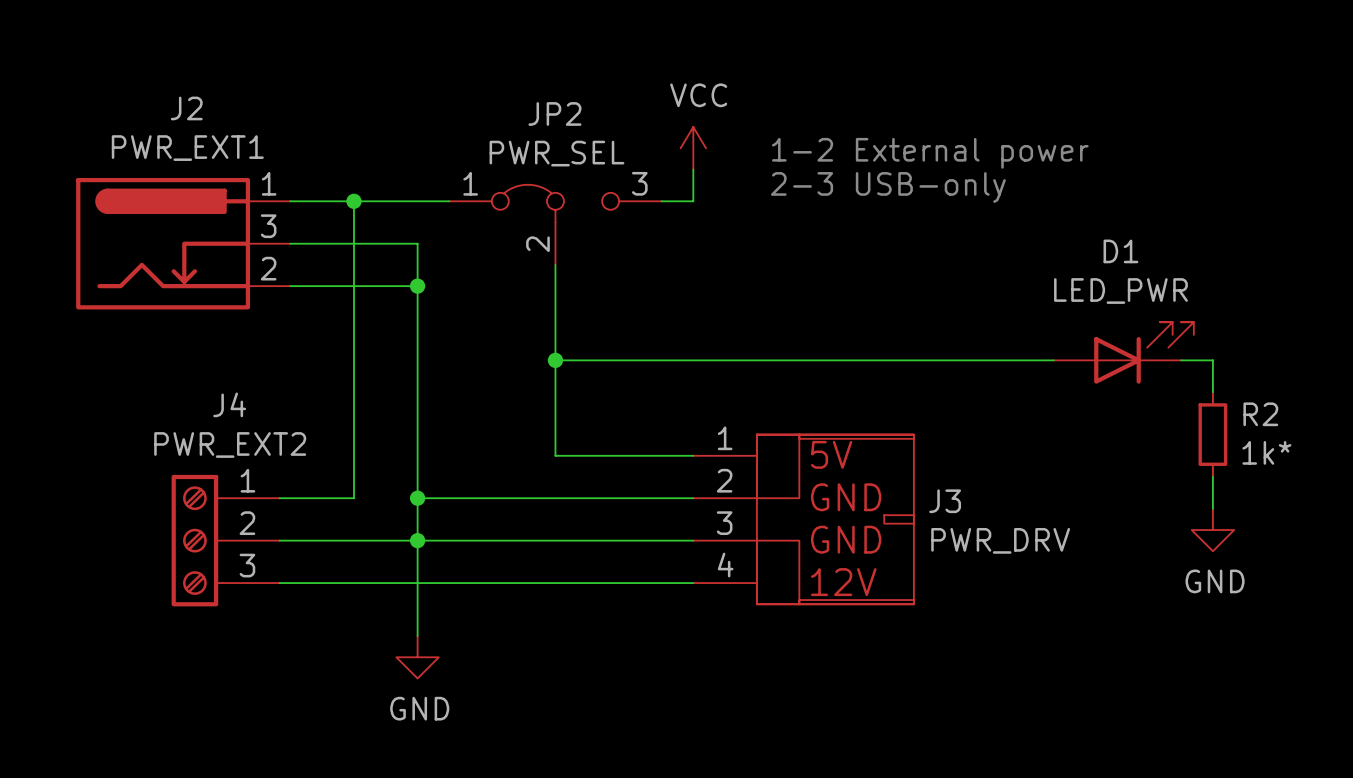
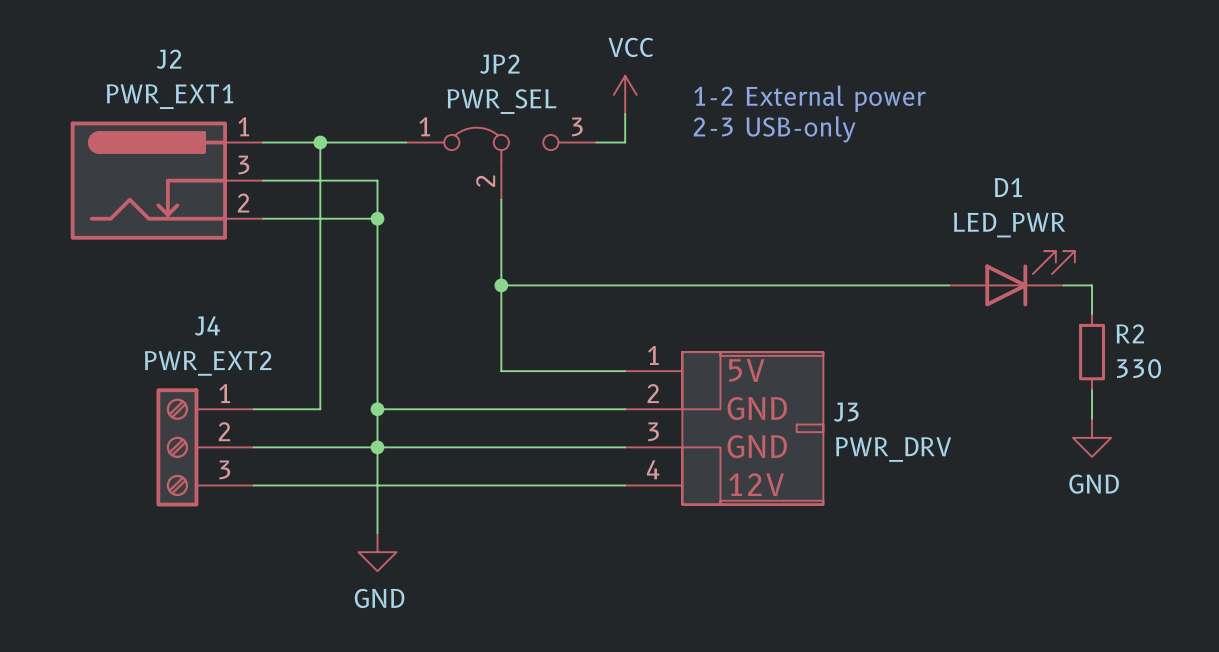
R2 value: 1k* (1266, 452) -> 330 (1139, 368)

